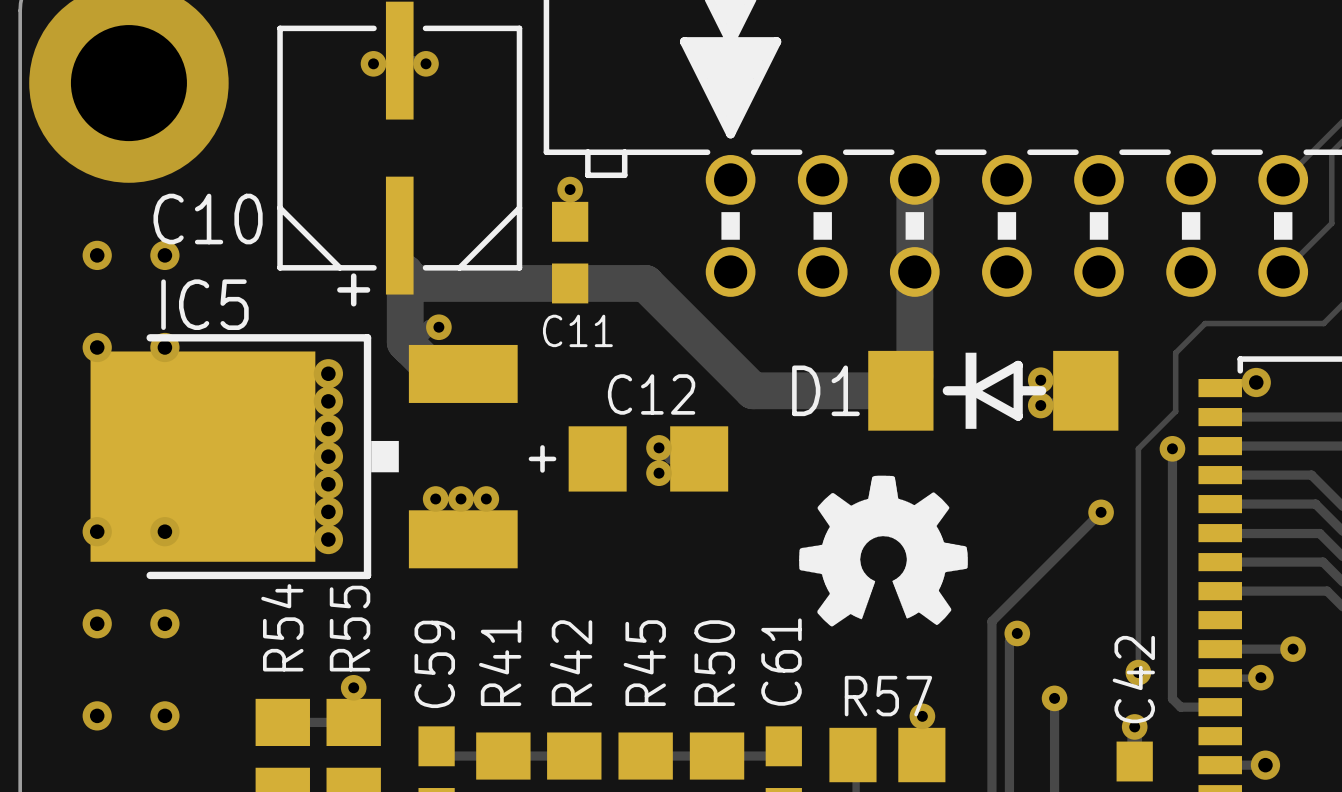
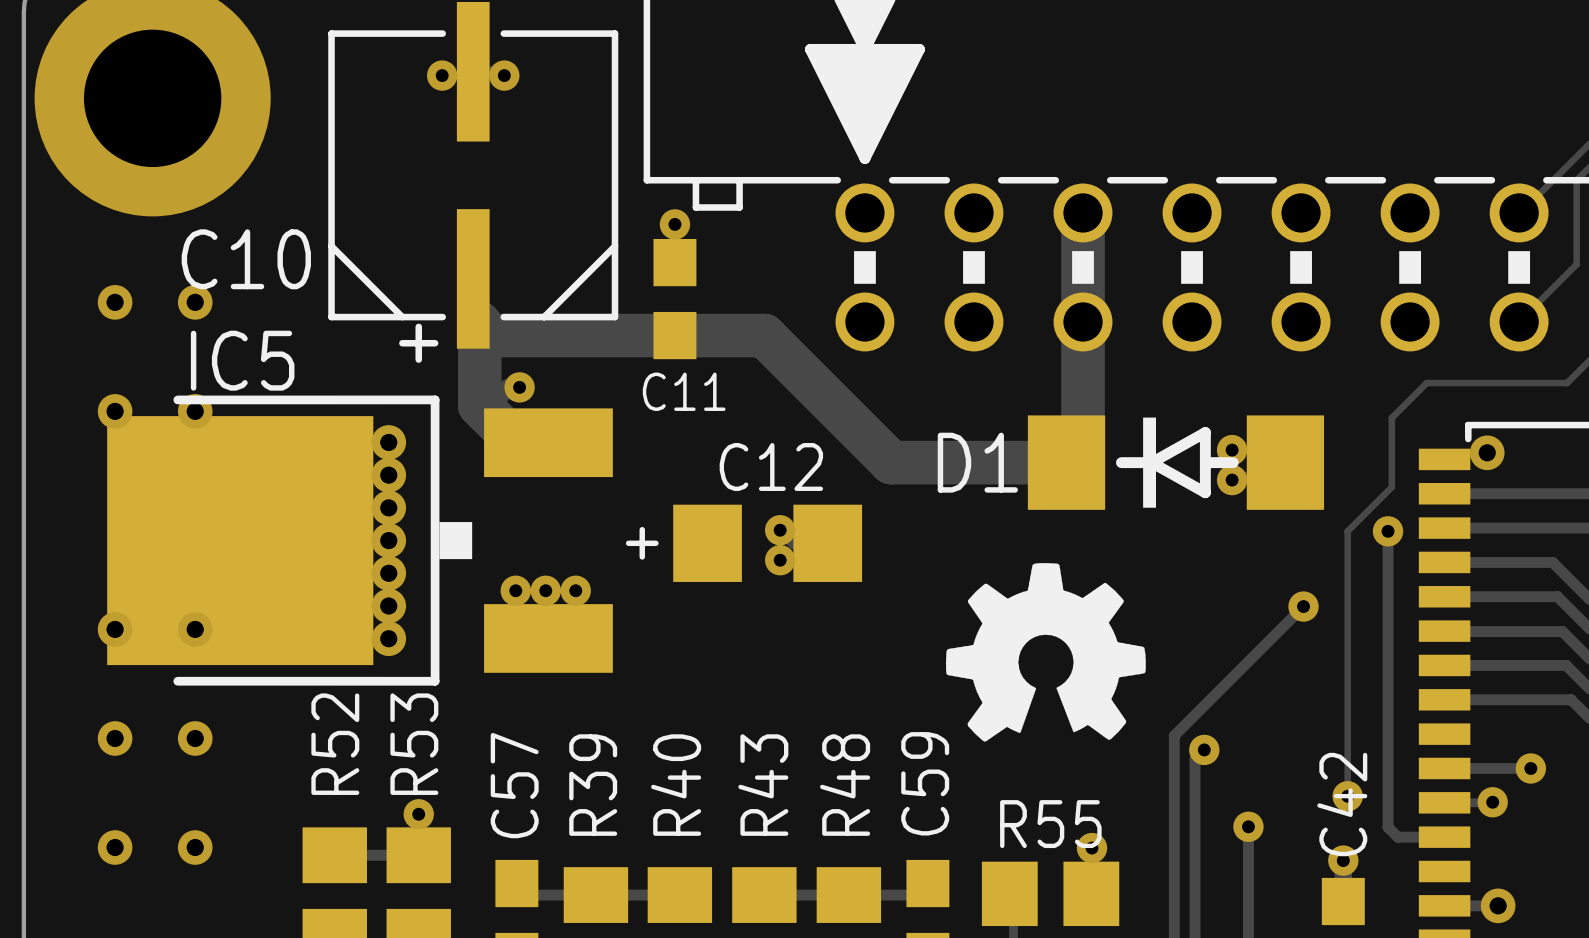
R54 name: R54 (282, 627) -> R52 (335, 744)
R55 name: R55 (350, 628) -> R53 (414, 744)
C61 name: C61 (781, 662) -> C59 (925, 783)
R41 name: R41 (500, 663) -> R39 (593, 785)
R42 name: R42 (571, 663) -> R40 (676, 785)
R45 name: R45 (644, 663) -> R43 (763, 785)
R50 name: R50 (714, 663) -> R48 (845, 785)
C59 name: C59 (434, 664) -> C57 (514, 785)
R57 name: R57 (888, 696) -> R55 (1050, 824)

